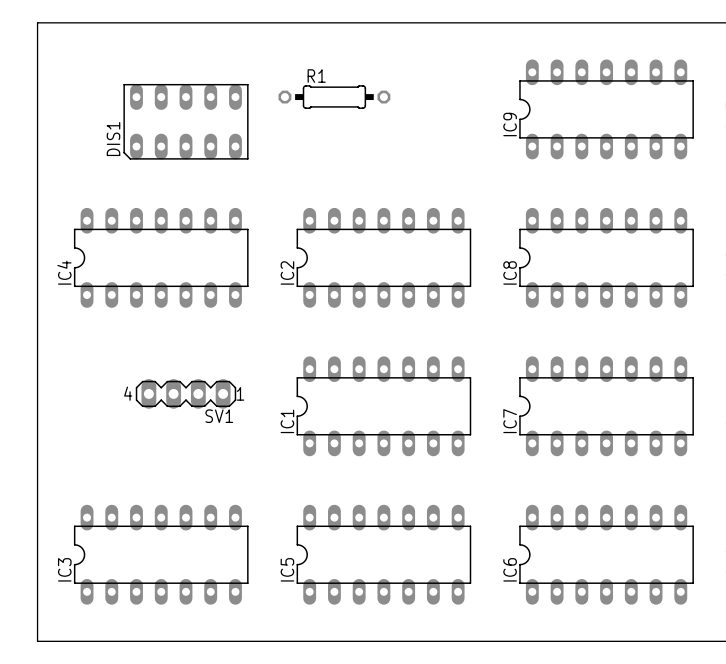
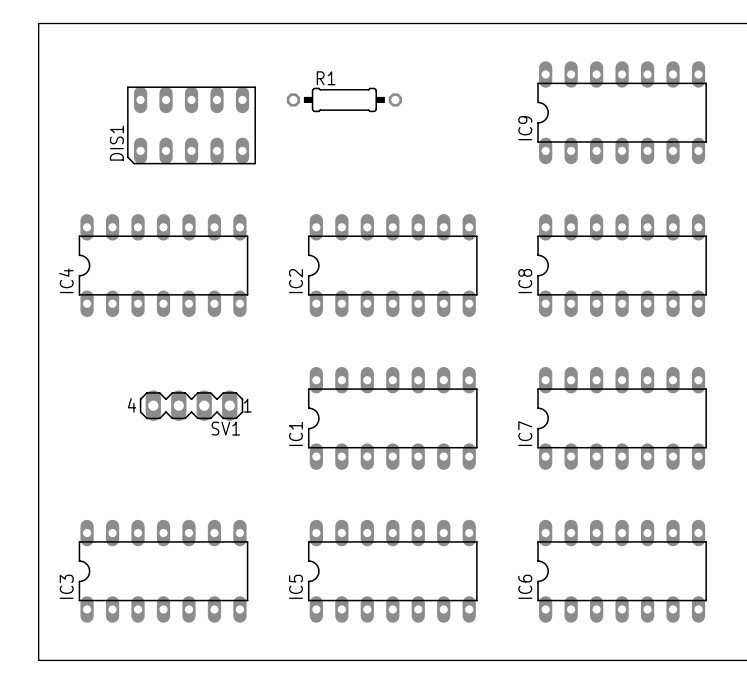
IC9 footprint: [519, 59, 694, 160] -> [537, 61, 707, 165]
IC4 footprint: [73, 207, 249, 308] -> [78, 214, 249, 318]
IC2 footprint: [296, 207, 472, 308] -> [307, 214, 478, 318]
IC8 footprint: [519, 207, 694, 308] -> [537, 214, 707, 318]
IC1 footprint: [296, 356, 472, 457] -> [307, 366, 478, 470]
IC7 footprint: [519, 356, 694, 457] -> [537, 366, 707, 470]
IC3 footprint: [73, 504, 249, 605] -> [78, 519, 249, 623]
IC5 footprint: [296, 504, 472, 605] -> [307, 519, 478, 623]
IC6 footprint: [519, 504, 694, 605] -> [537, 519, 707, 623]

